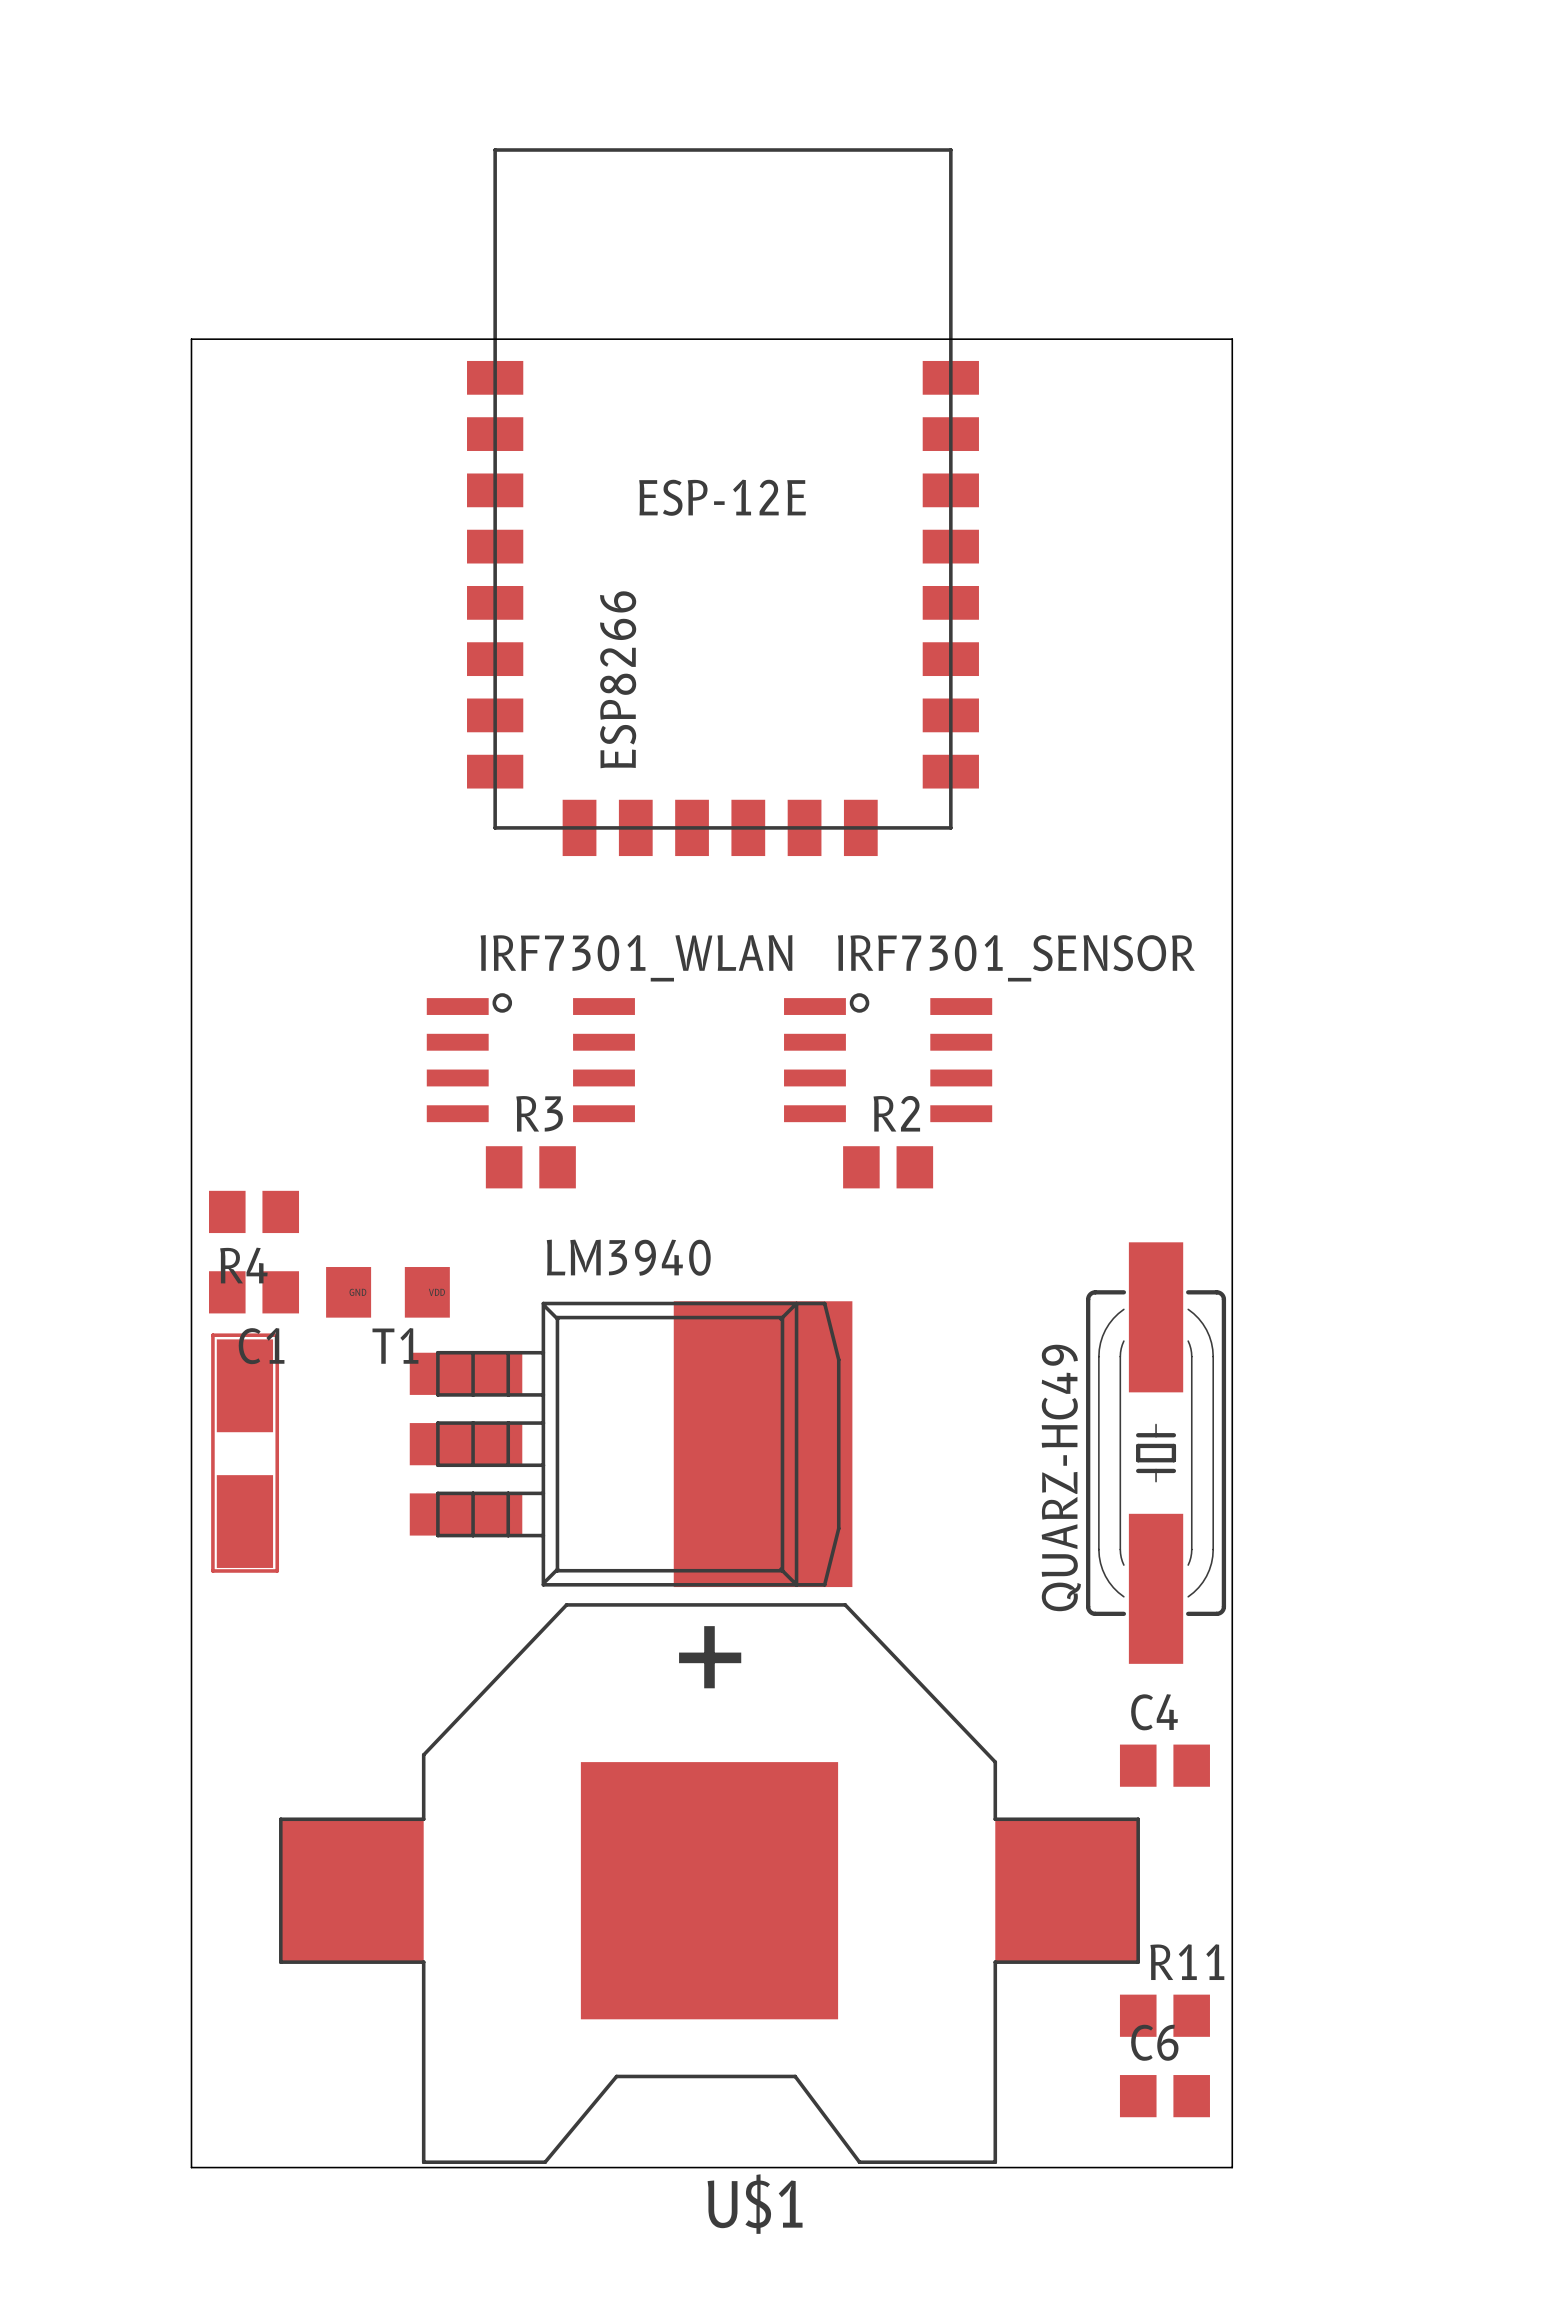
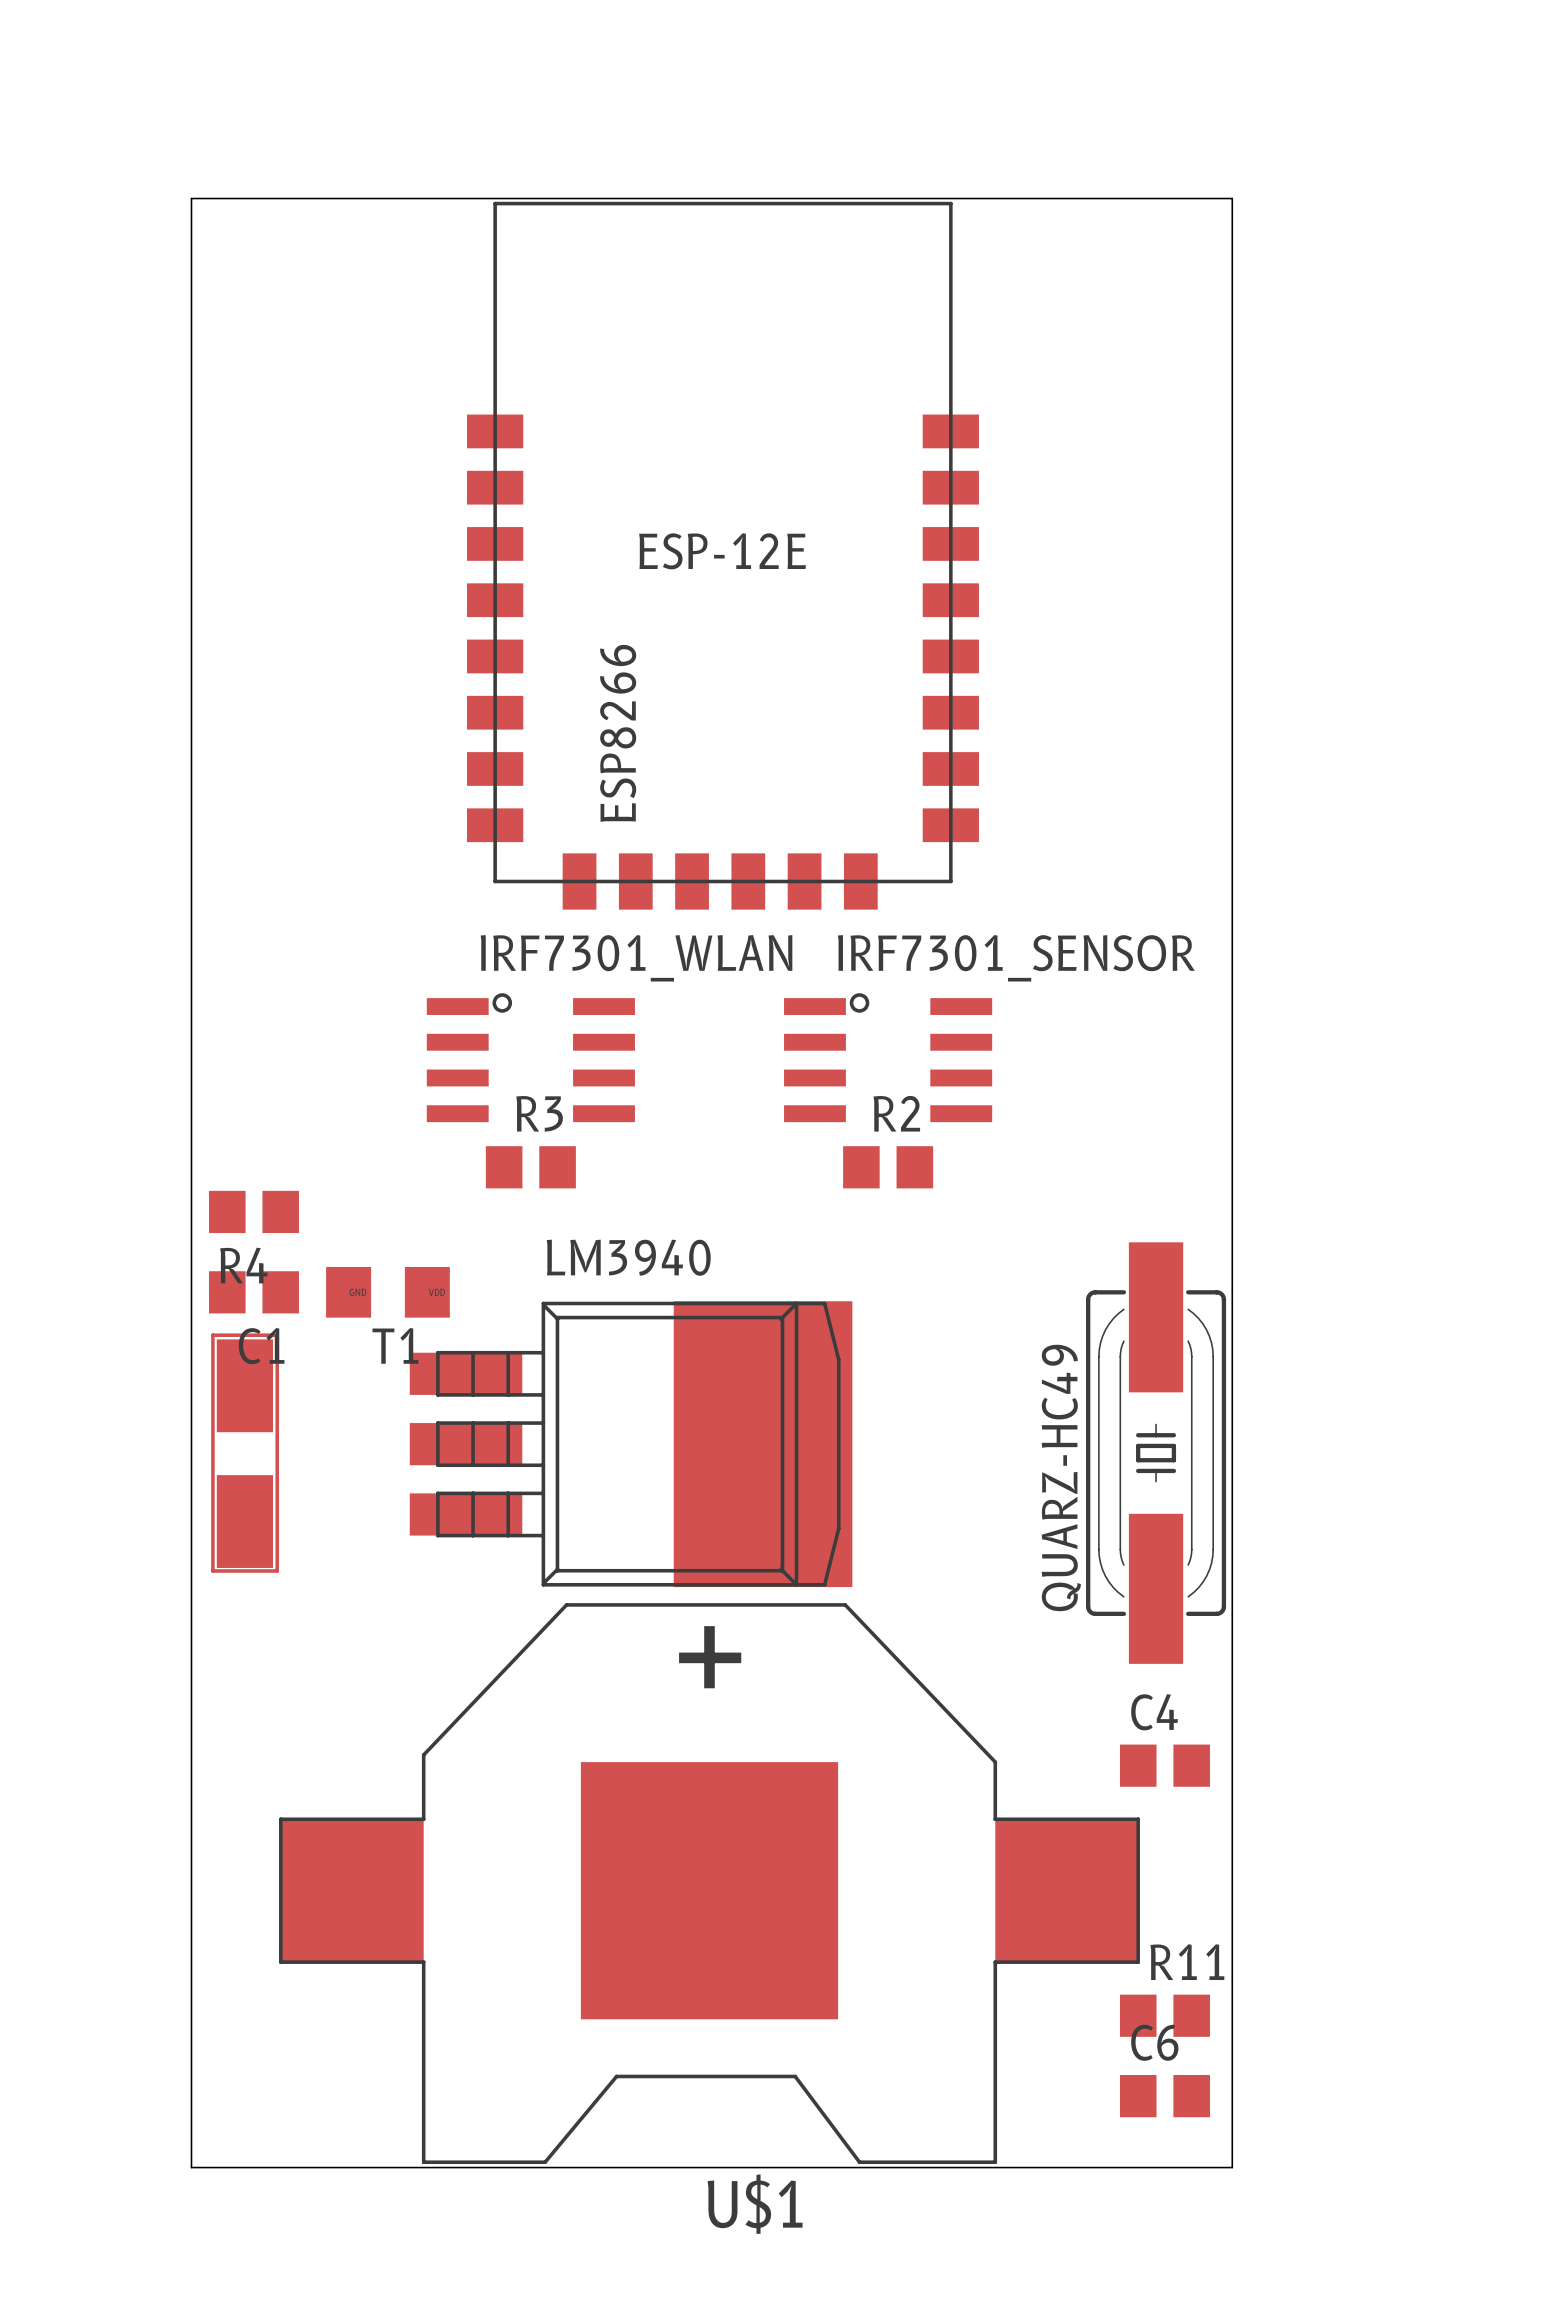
board edge: (191, 339) (1232, 339) -> (191, 339) (191, 198) (1232, 198) (1232, 339)
ESP8266 position: (722, 502) -> (722, 555)

